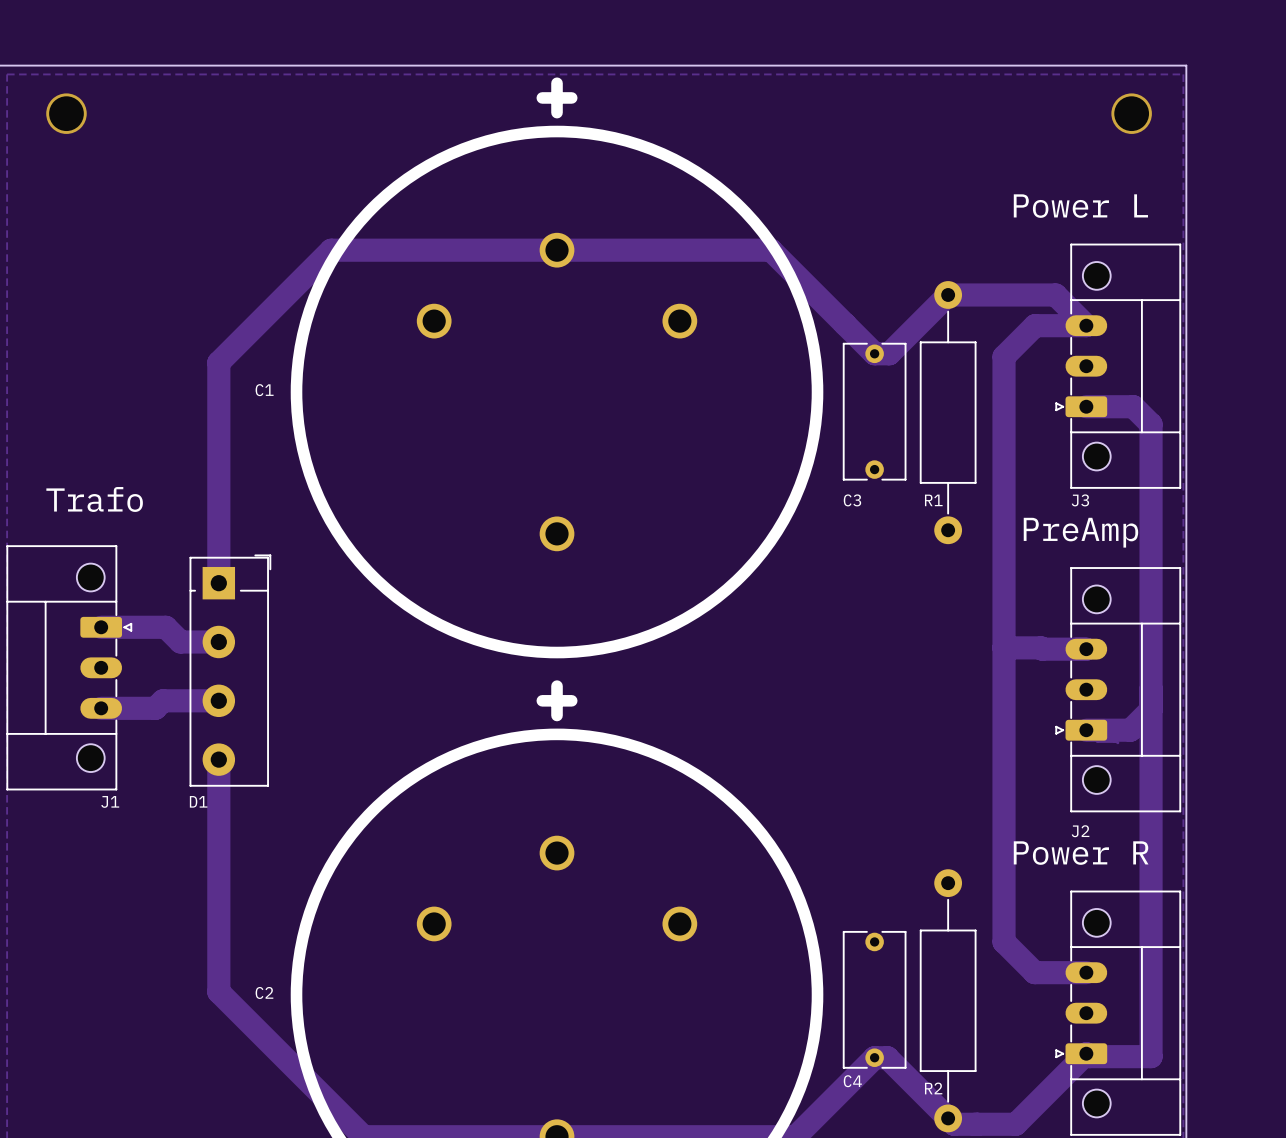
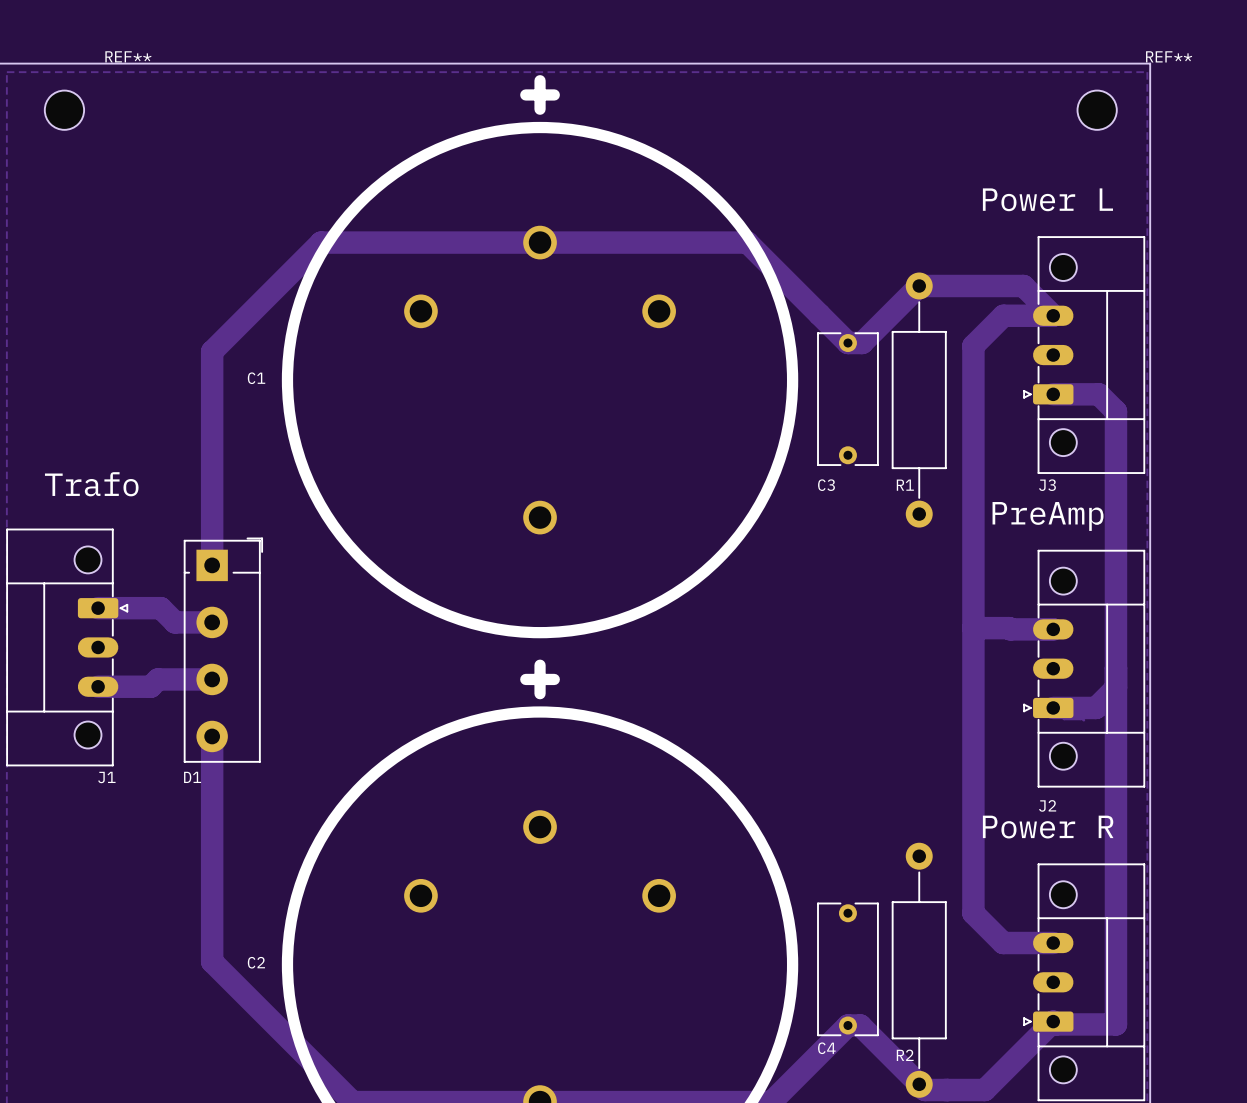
via: (66, 113) -> none
REF**: none -> (64, 110)
via: (1131, 113) -> none
REF**: none -> (1097, 110)

